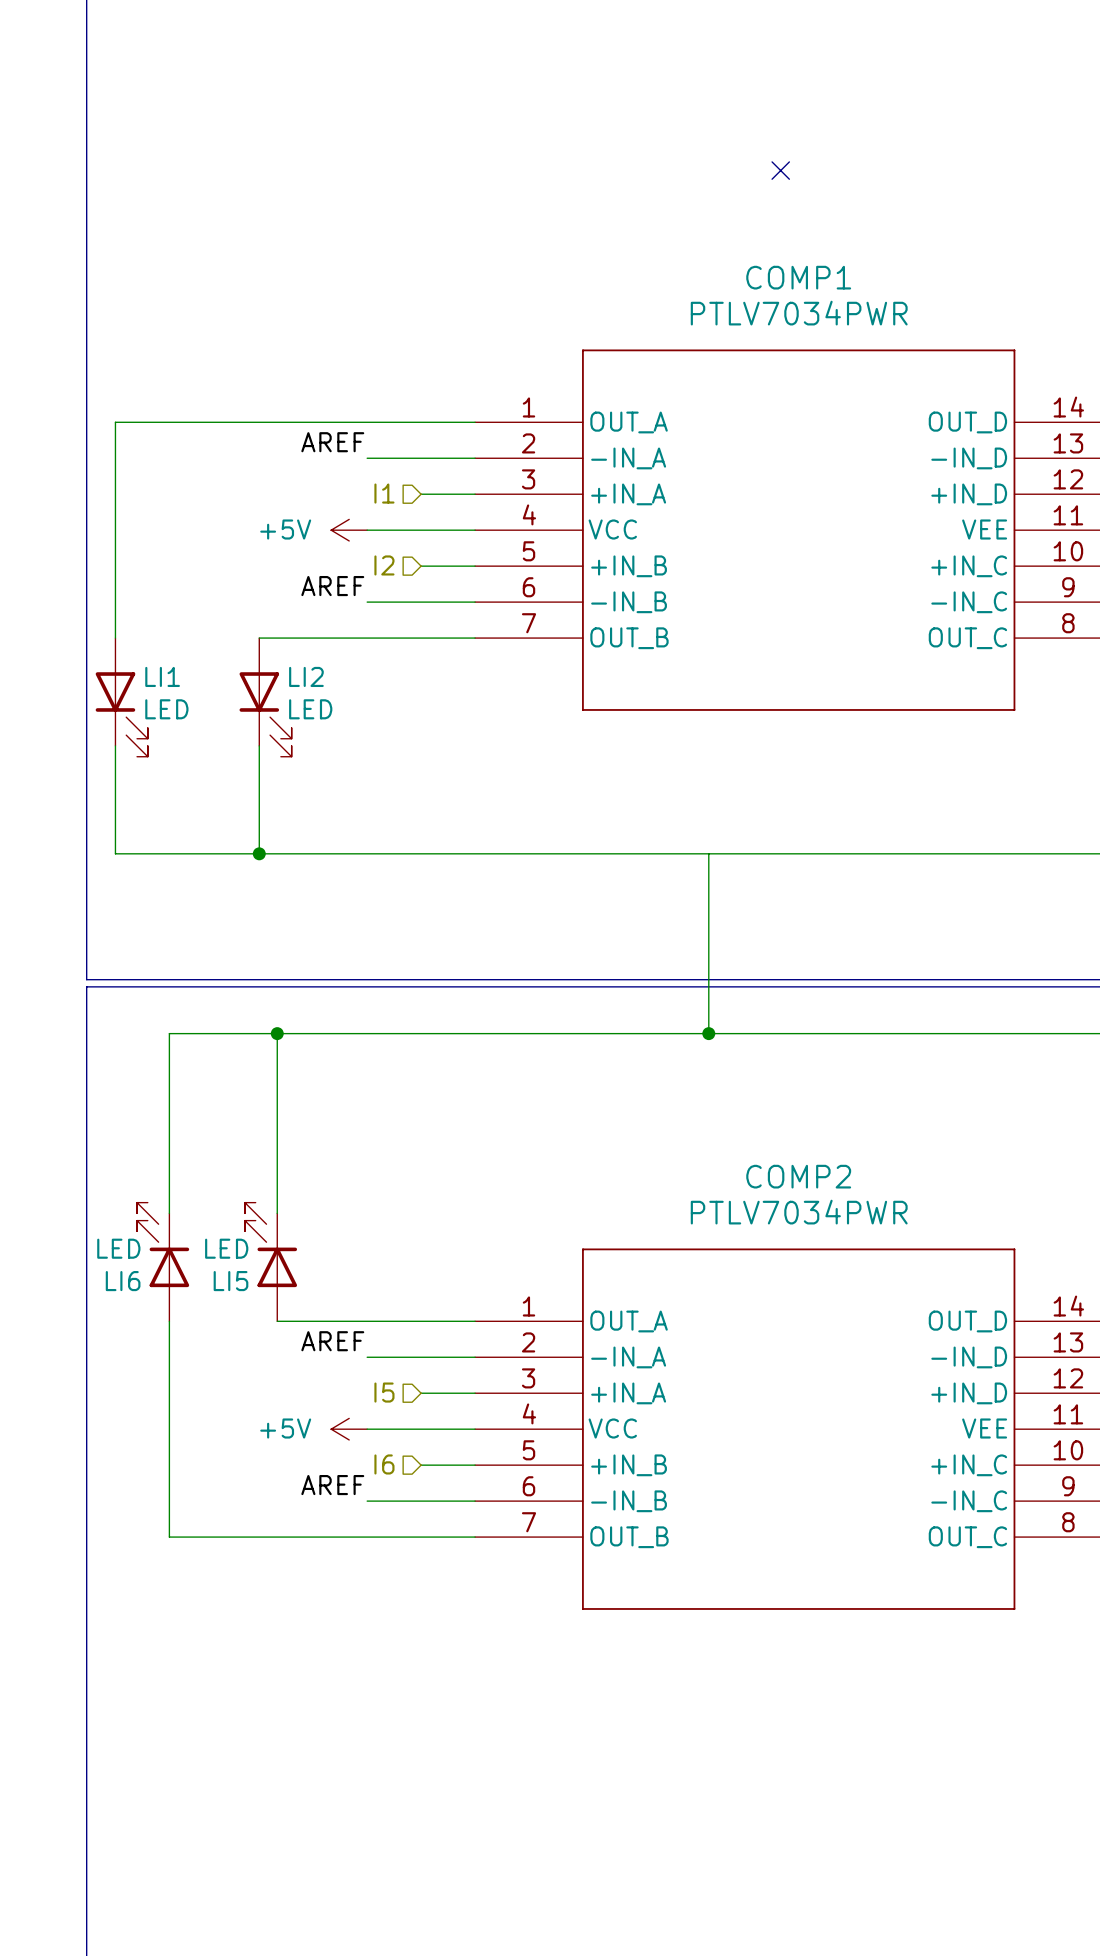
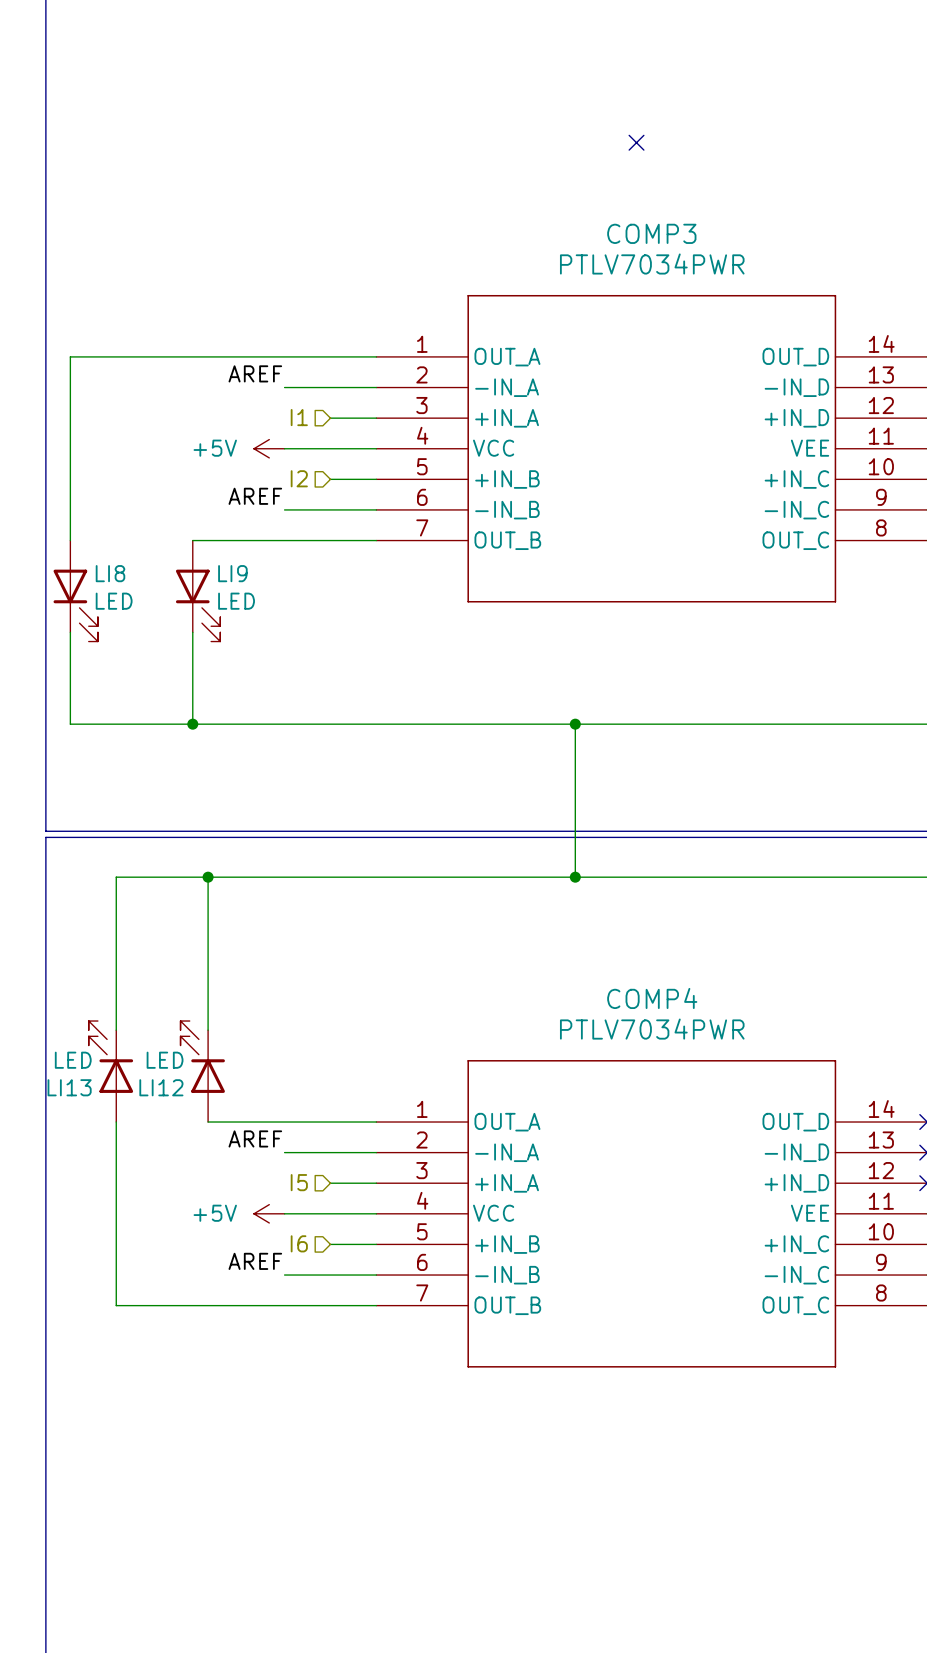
COMP1 name: COMP1 (798, 277) -> COMP3 (651, 233)
LI1 name: LI1 (162, 676) -> LI8 (110, 573)
LI2 name: LI2 (306, 676) -> LI9 (232, 573)
junction: none -> (575, 724)
COMP2 name: COMP2 (798, 1176) -> COMP4 (652, 998)
LI6 name: LI6 (123, 1281) -> LI13 (69, 1087)
LI5 name: LI5 (230, 1281) -> LI12 (161, 1087)

